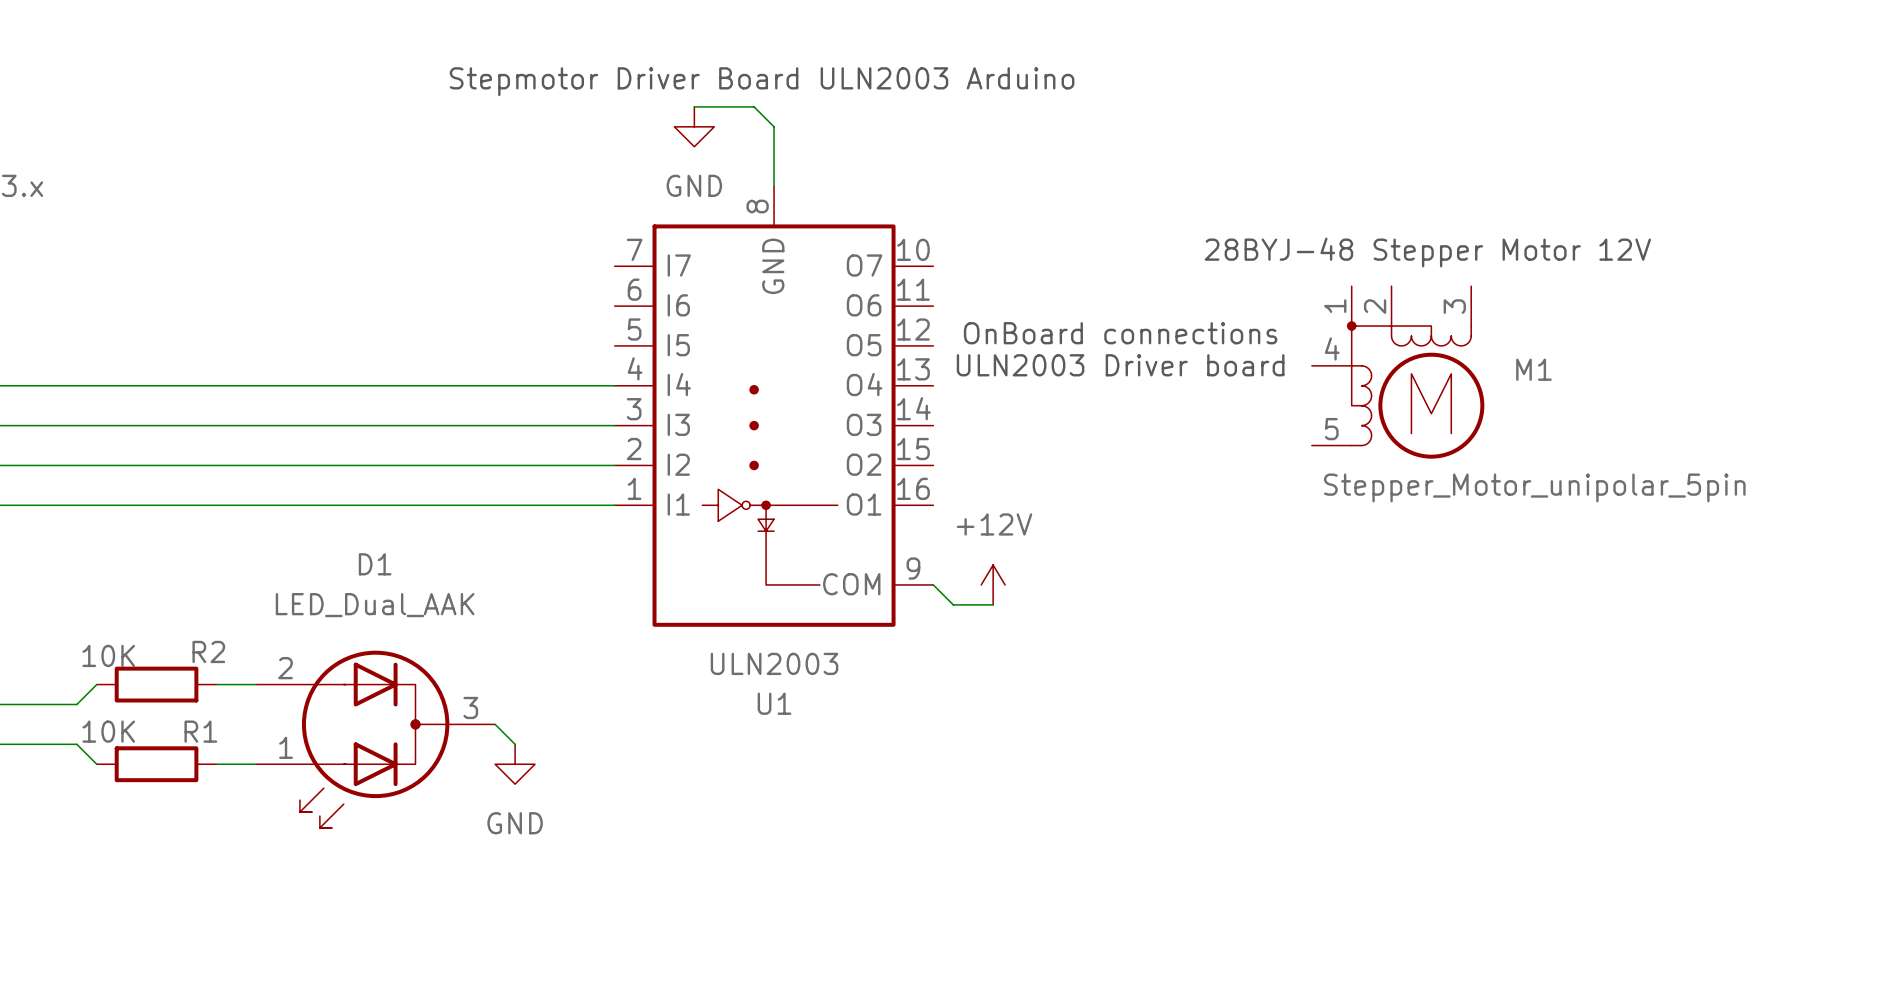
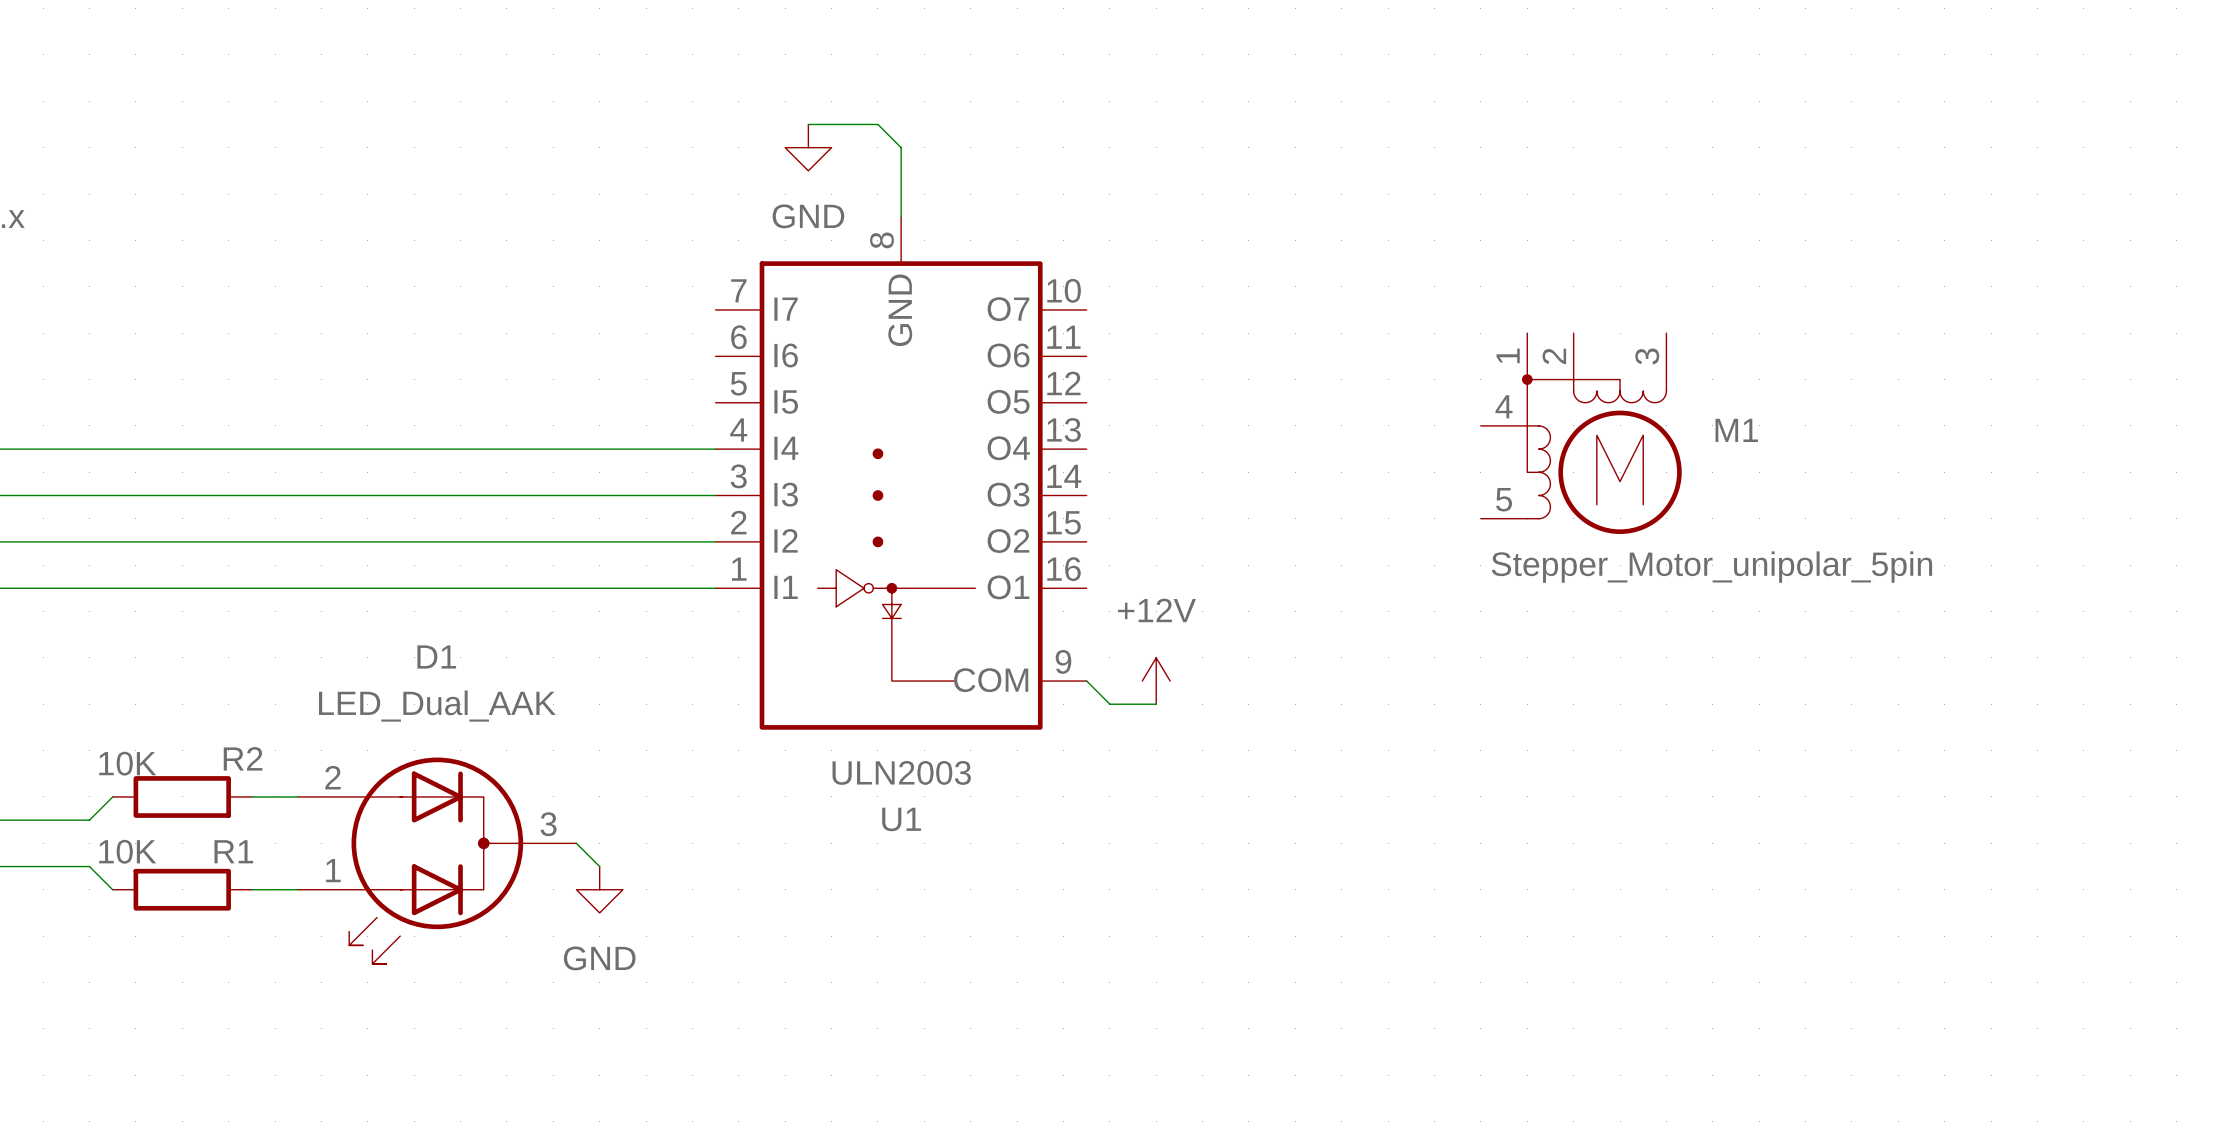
text: Stepmotor Driver Board ULN2003 Arduino (762, 81) -> none
text: 28BYJ-48 Stepper Motor 12V (1427, 252) -> none
text: OnBoard connections (1120, 333) -> none
text: ULN2003 Driver board (1120, 365) -> none
M1 position: (1398, 372) -> (1581, 433)

